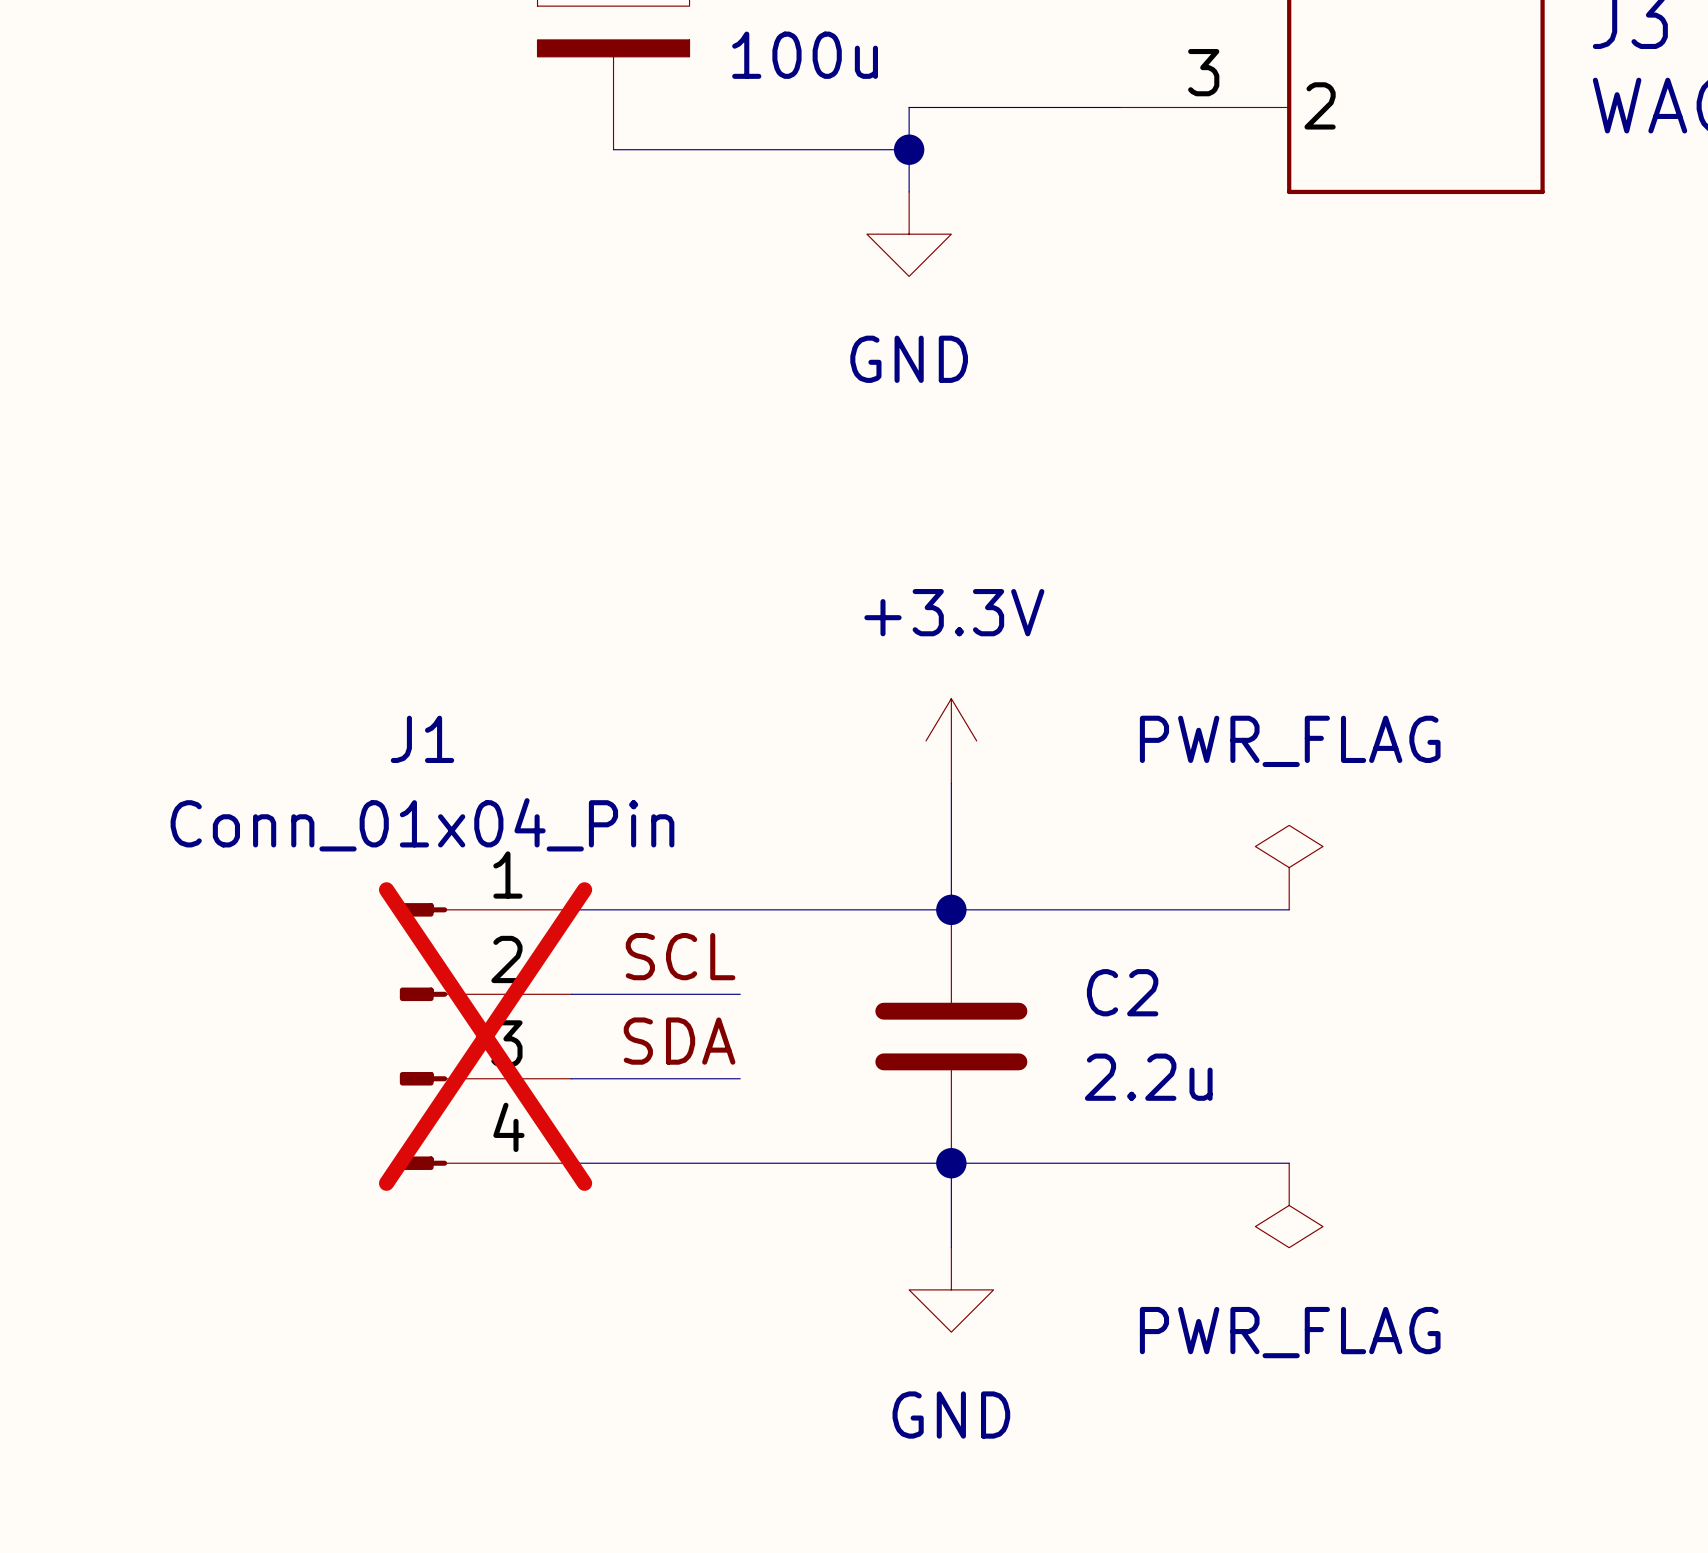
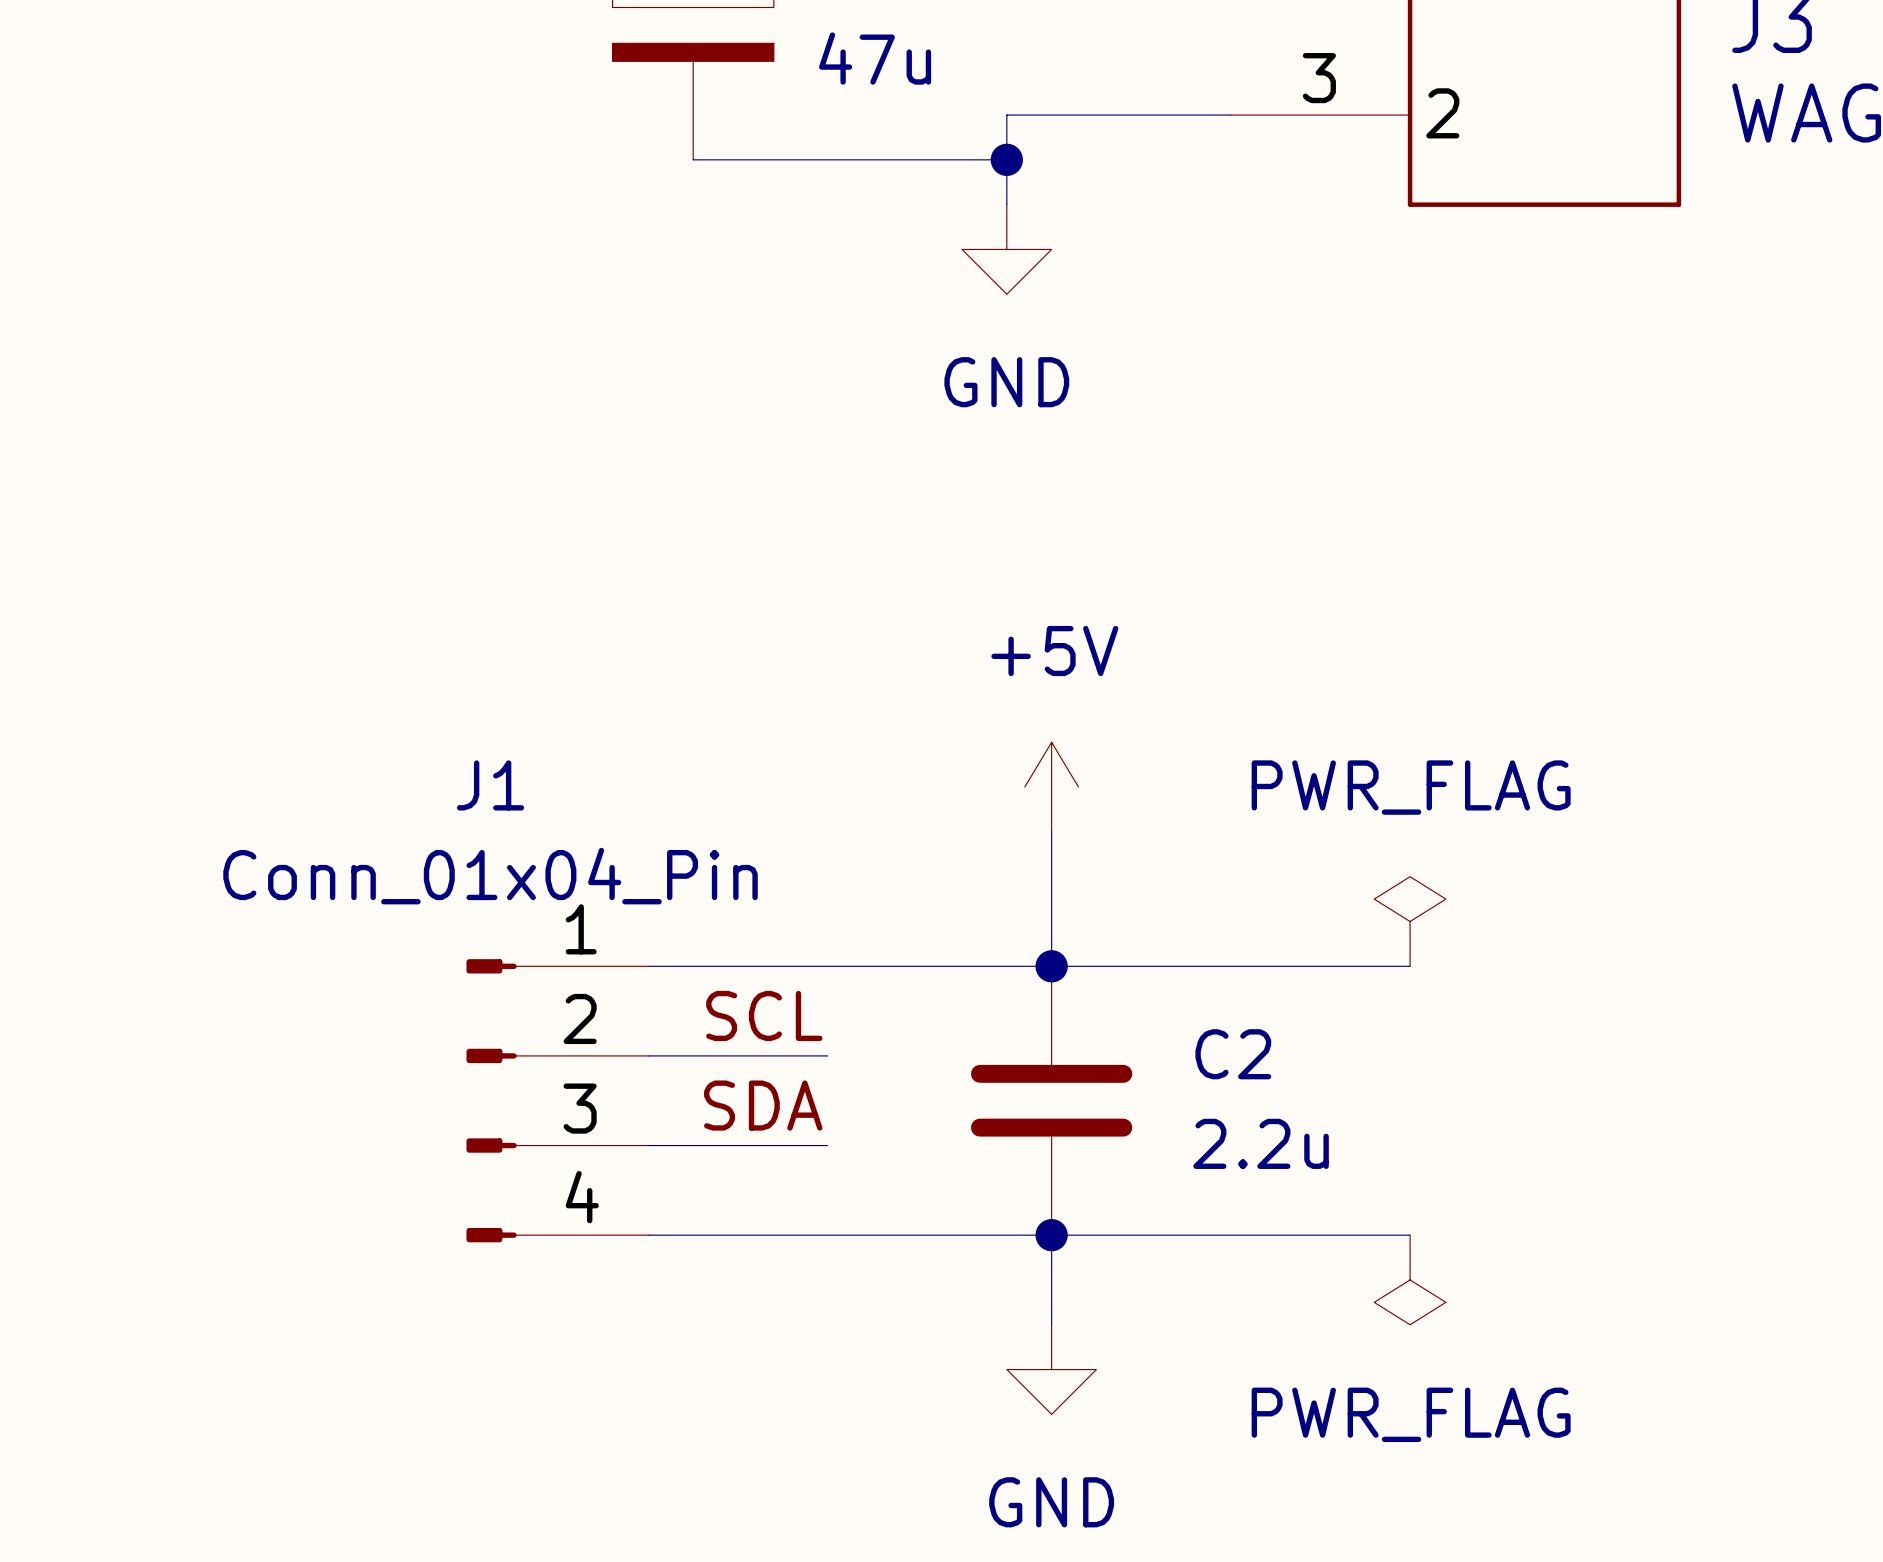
part value: 100u (805, 55) -> 47u (875, 58)
power symbol: +3.3V (951, 740) -> +5V (1051, 787)
J1 do-not-place cross: (485, 1036) -> none

